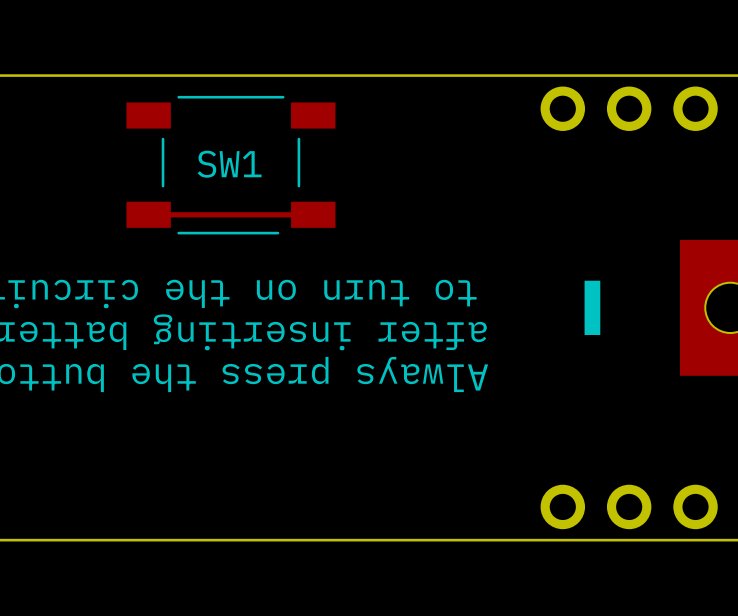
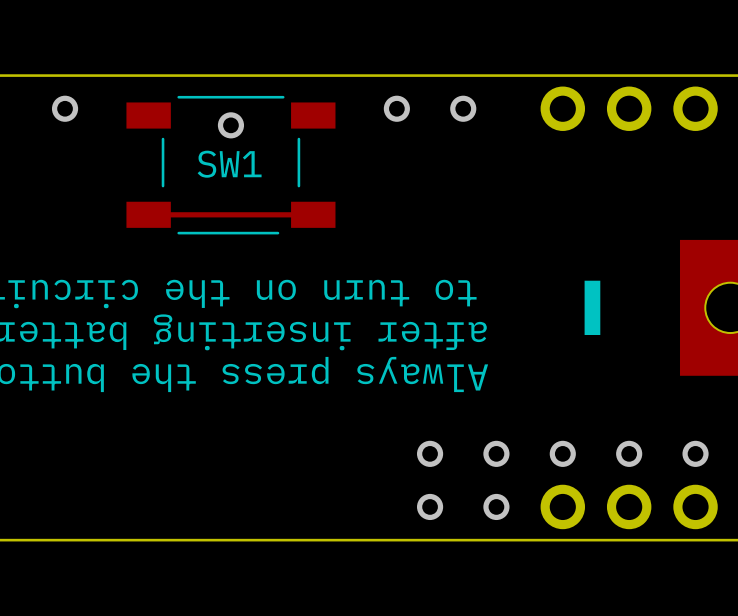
via: none -> (65, 108)
via: none -> (396, 108)
via: none -> (463, 108)
via: none -> (230, 125)
via: none -> (430, 453)
via: none -> (496, 453)
via: none -> (562, 453)
via: none -> (629, 453)
via: none -> (695, 453)
via: none -> (430, 506)
via: none -> (496, 506)

